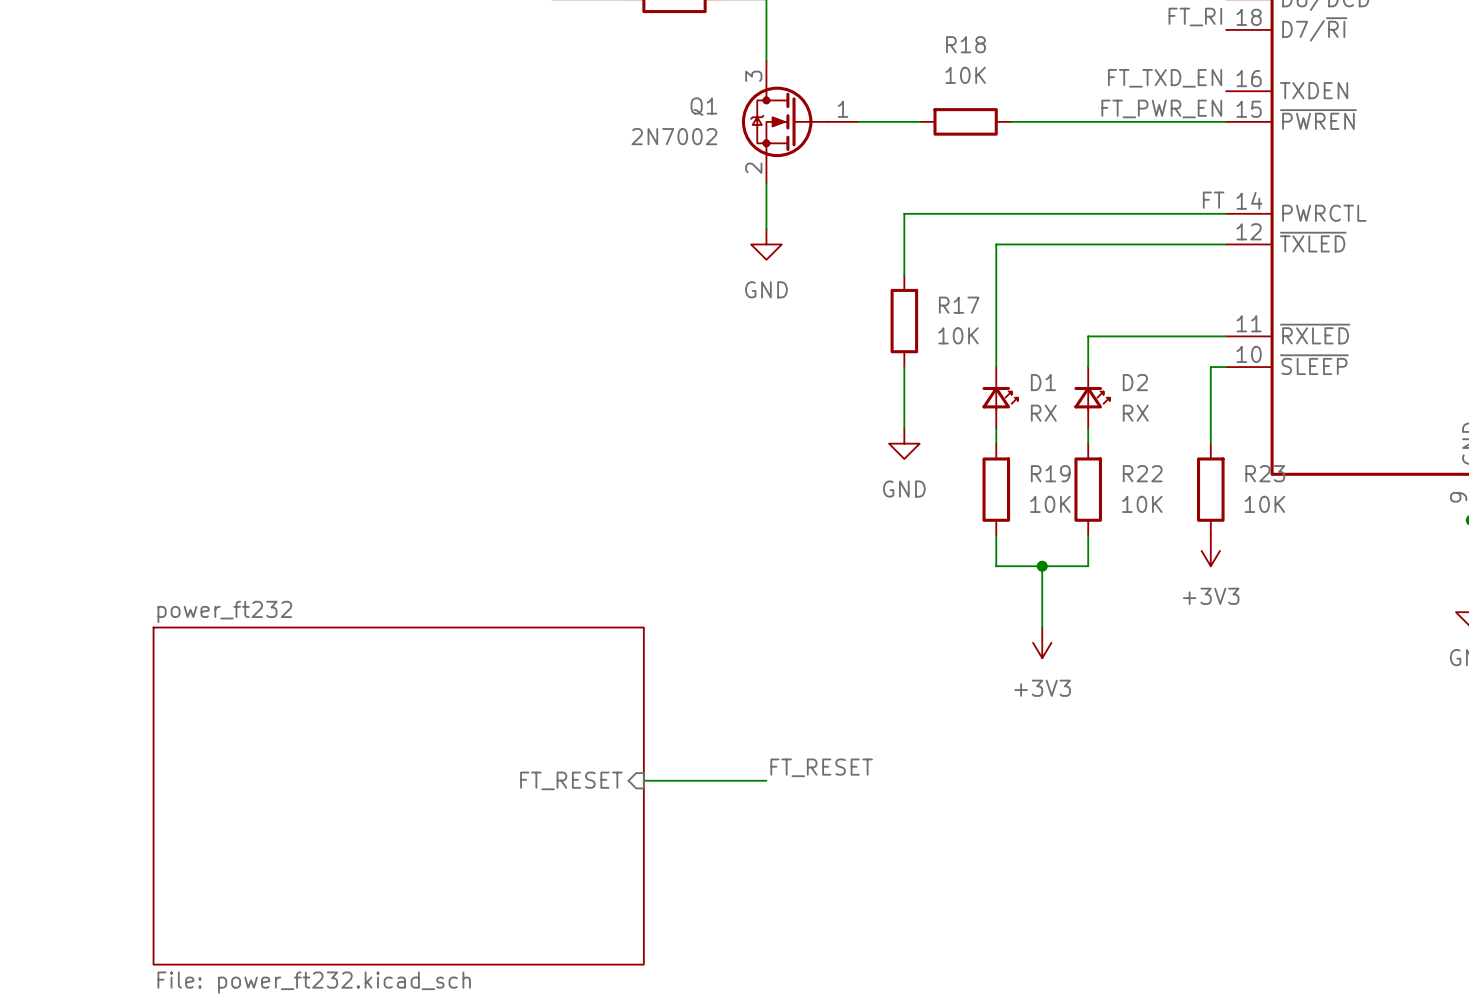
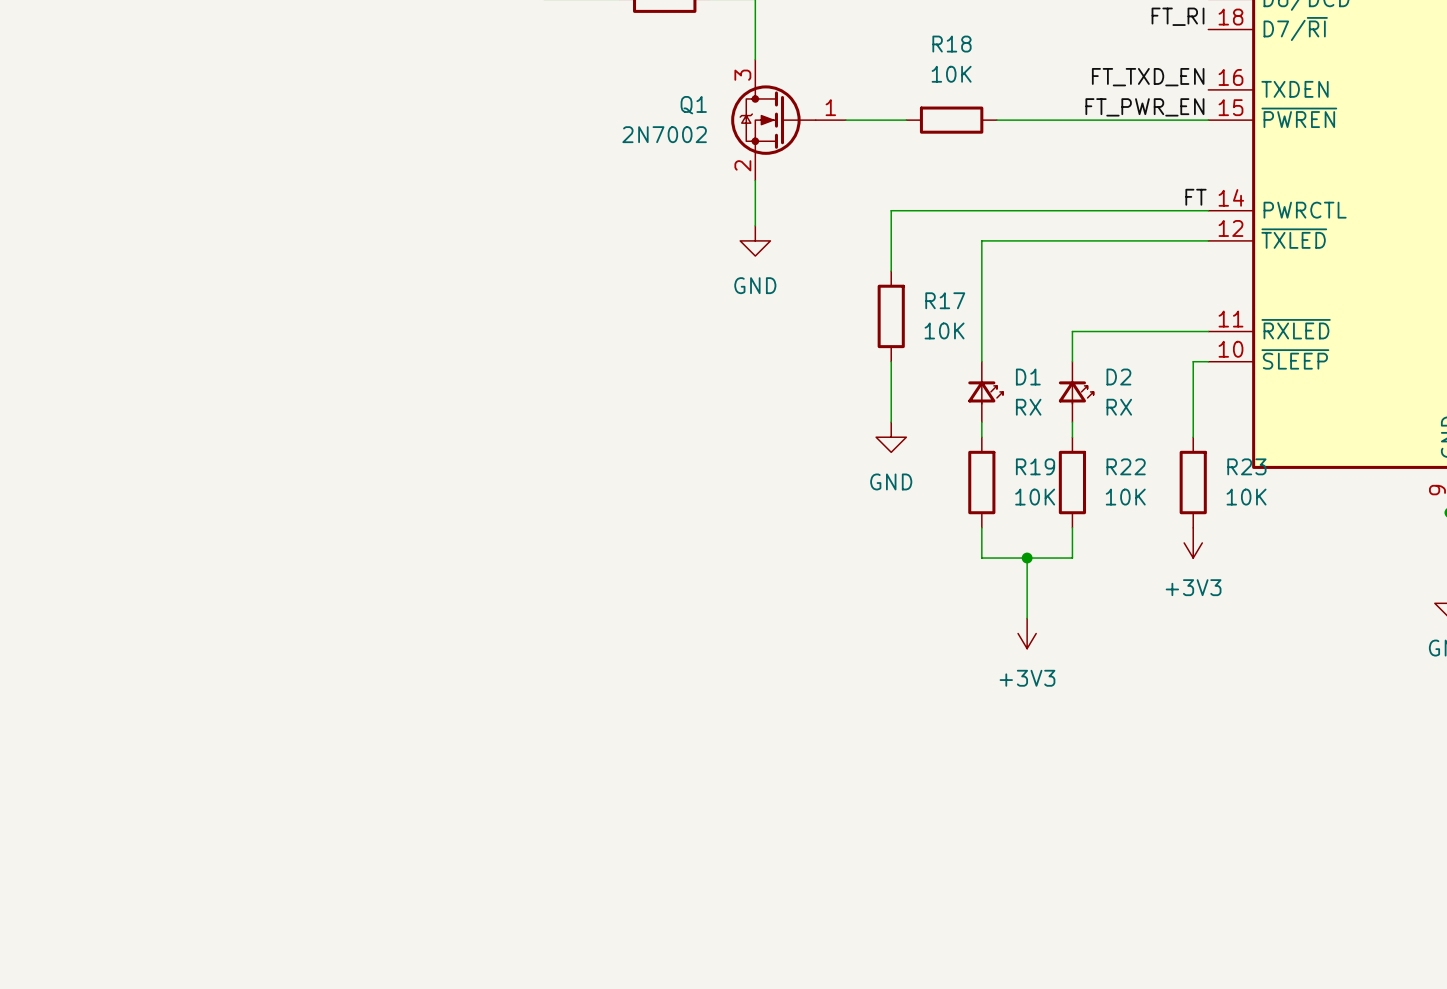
label: FT_RESET (821, 767) -> none
sheet pin: FT_RESET (571, 780) -> none
wire: (643, 780) (766, 780) -> none
sheet power_ft232: File: power_ft232.kicad_sch (398, 796) -> none

